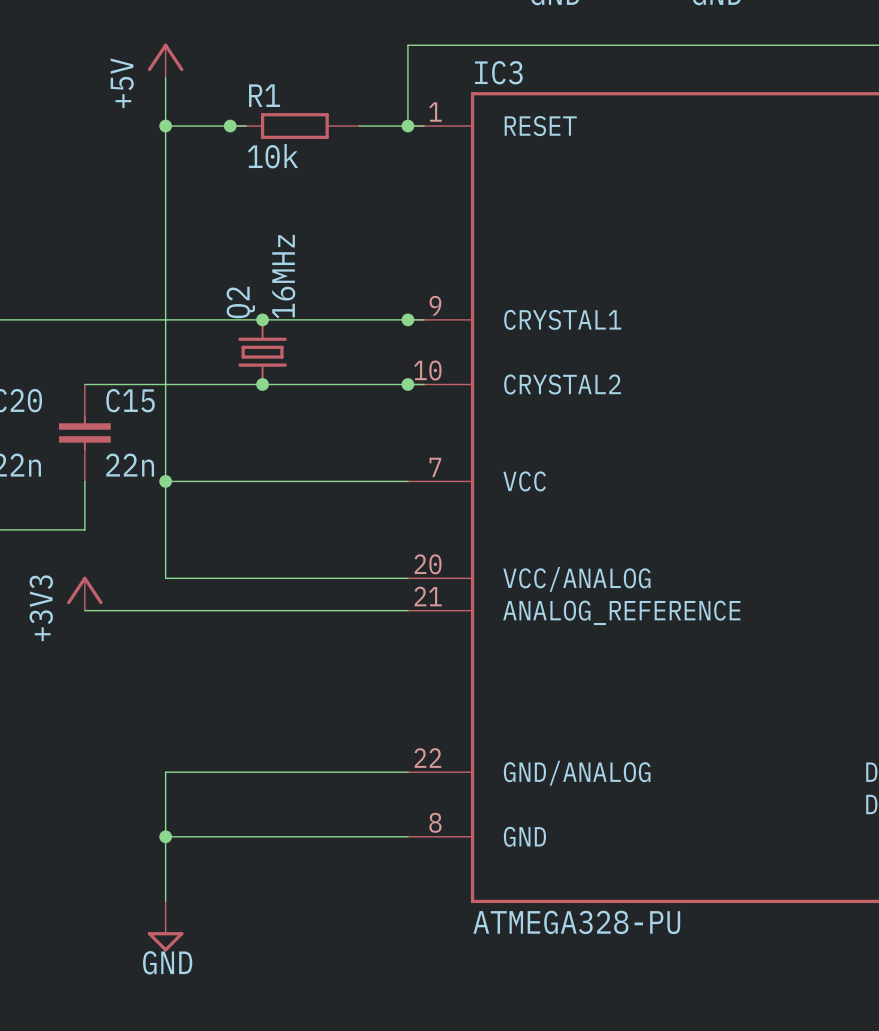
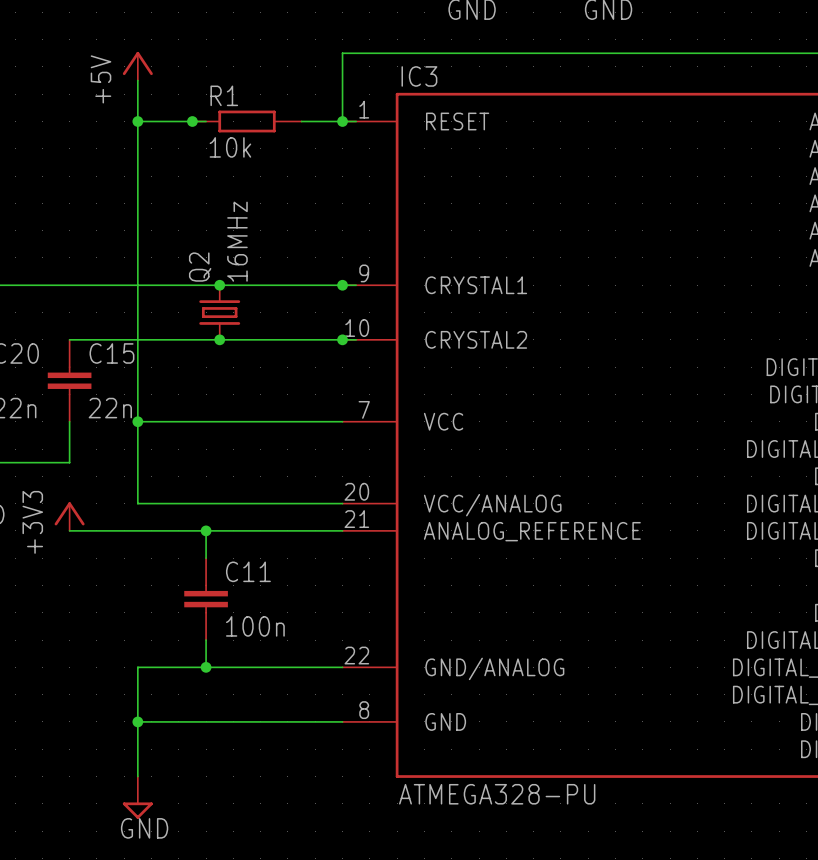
wire: none -> (206, 530) (206, 558)
junction: none -> (206, 530)
C11: none -> 100n (206, 599)
wire: none -> (206, 640) (206, 667)
junction: none -> (206, 667)

